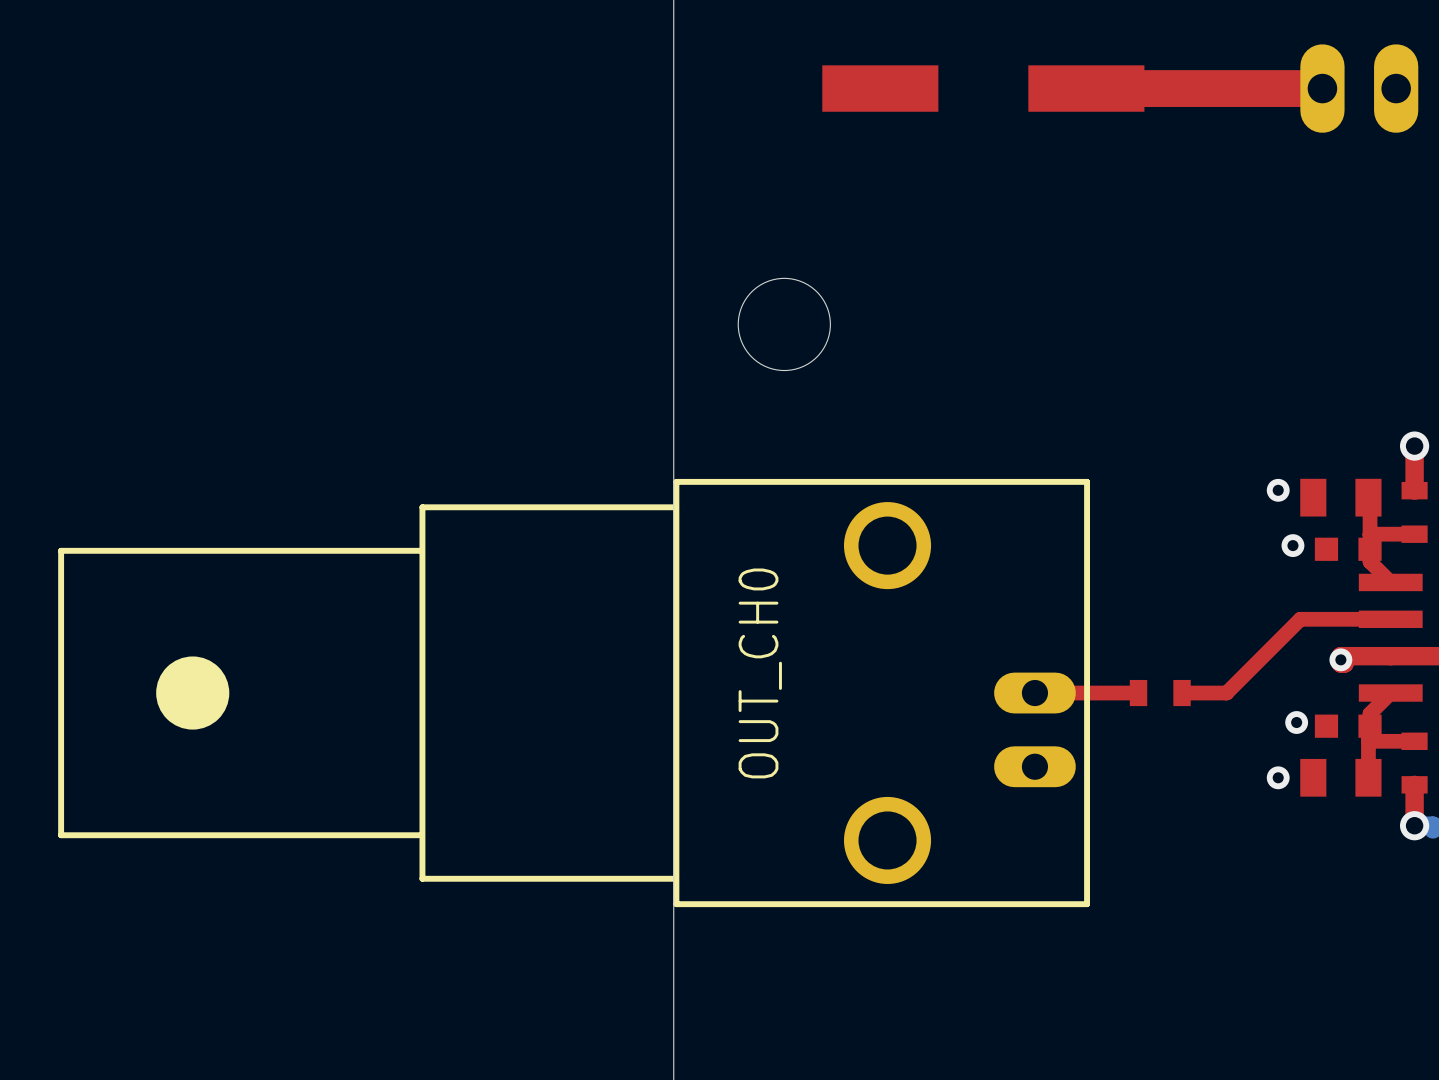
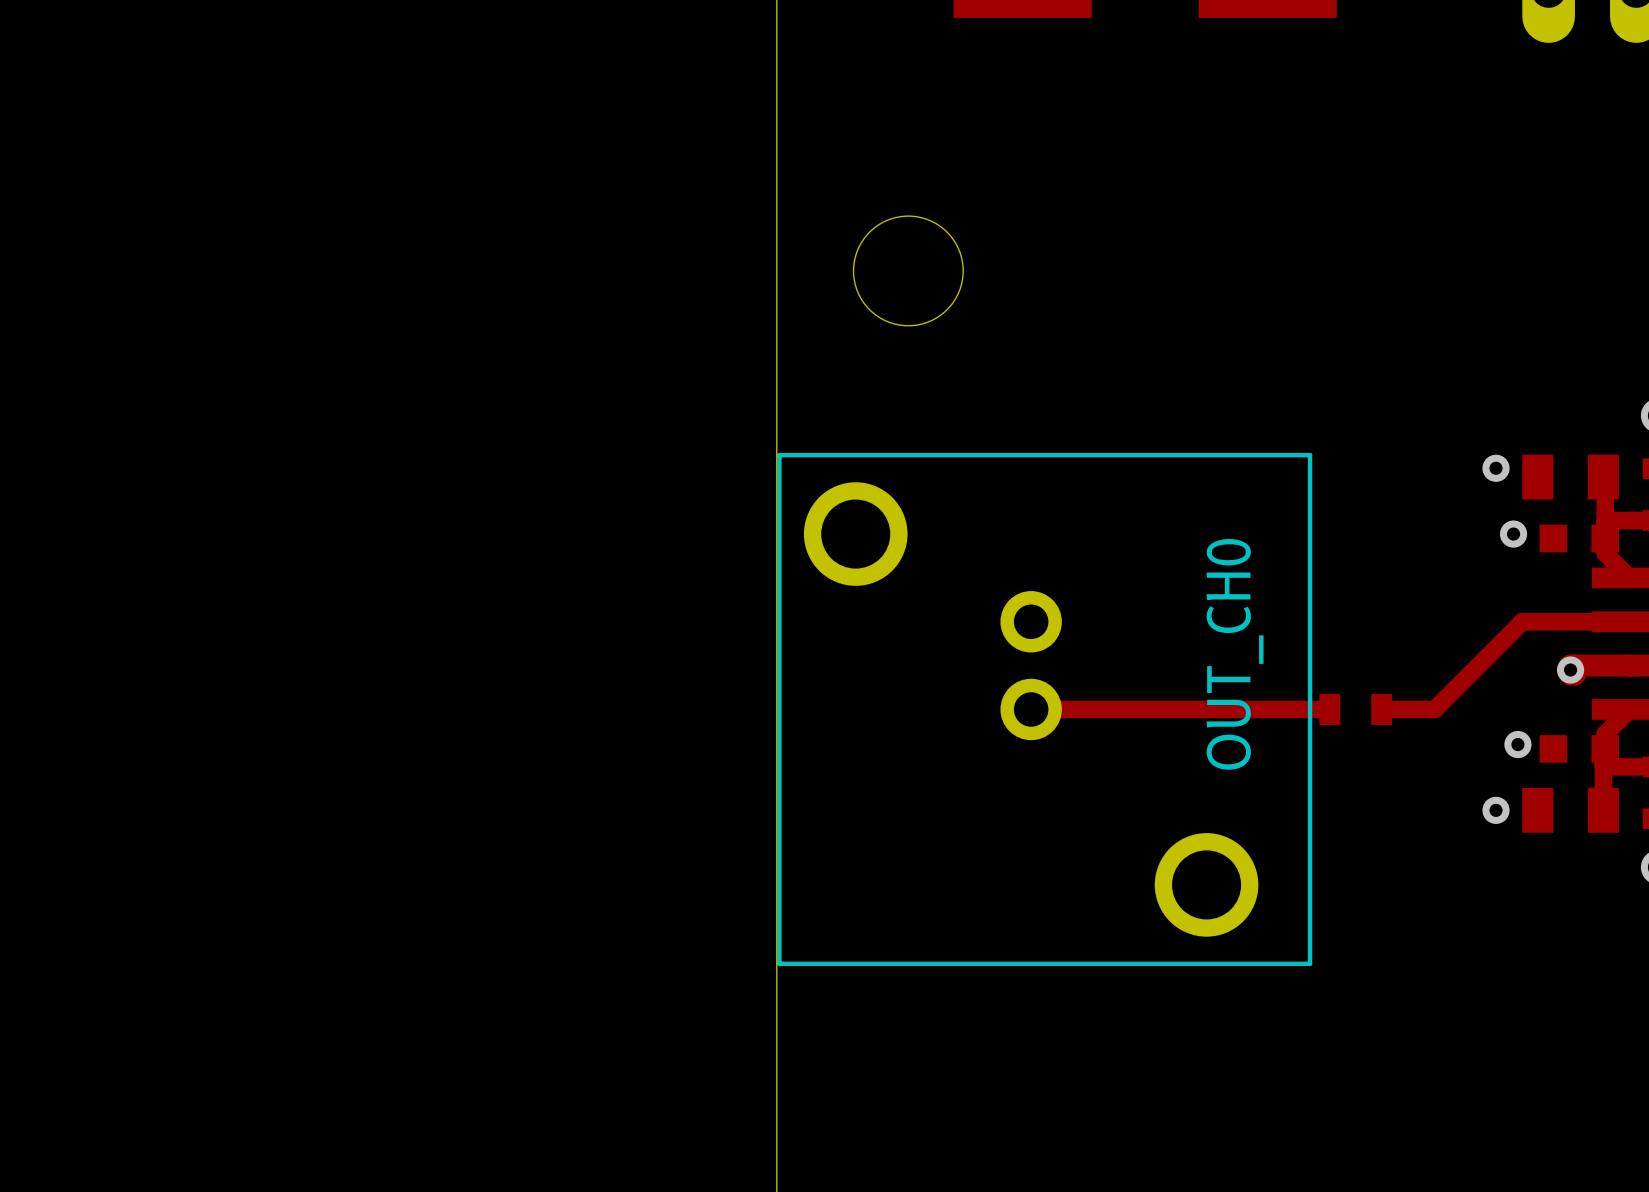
OUT_CH0 footprint: [58, 478, 1091, 908] -> [777, 452, 1313, 967]
top track: none -> (1206, 709) (1031, 709)

